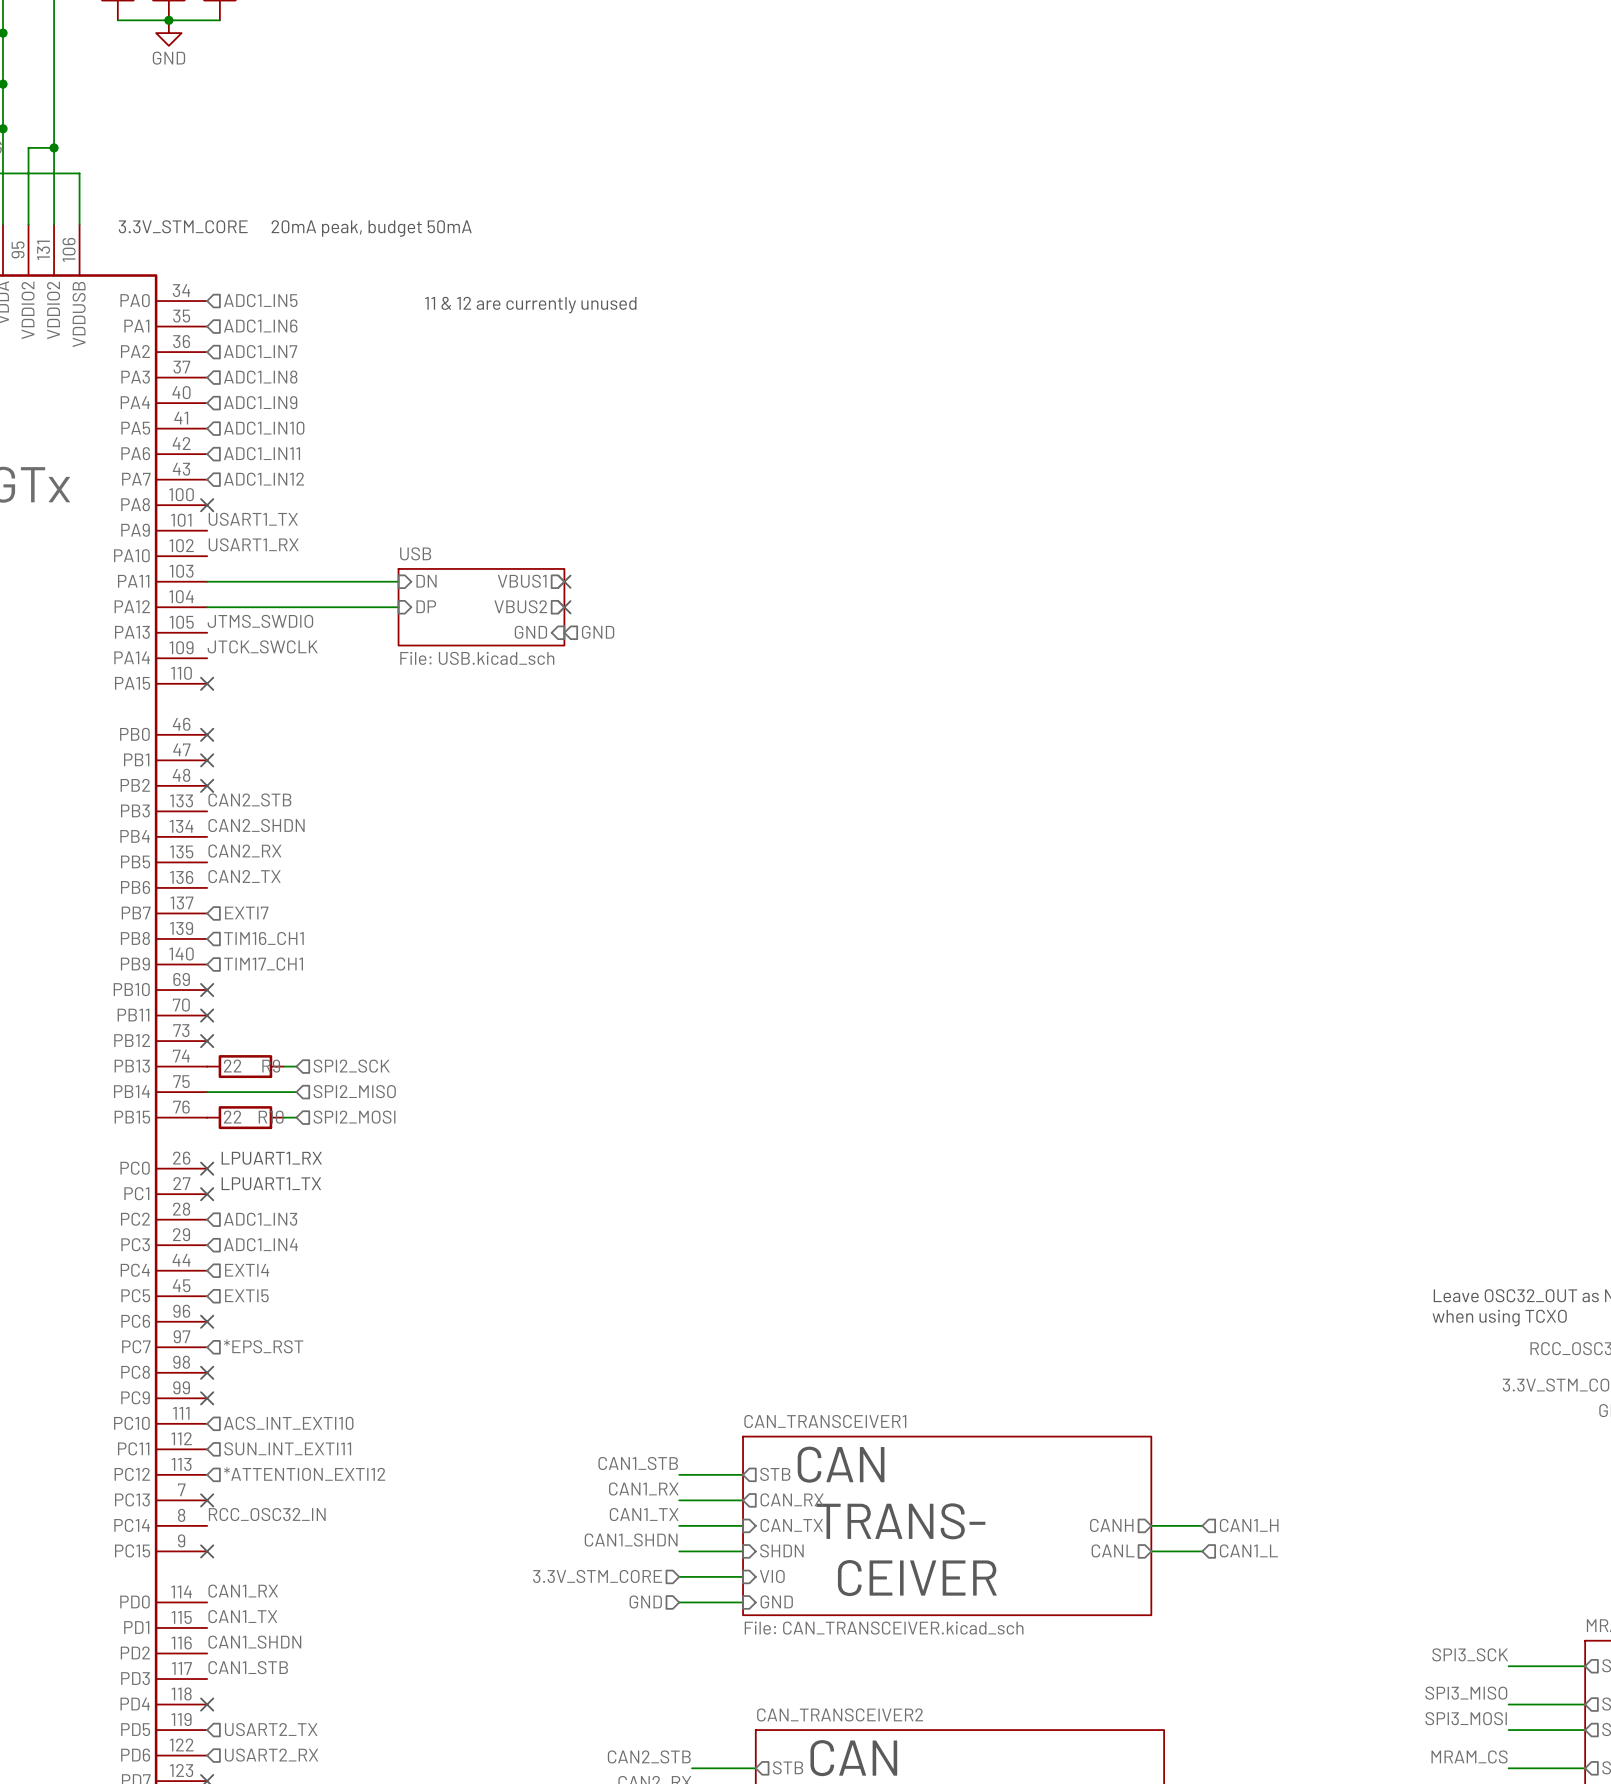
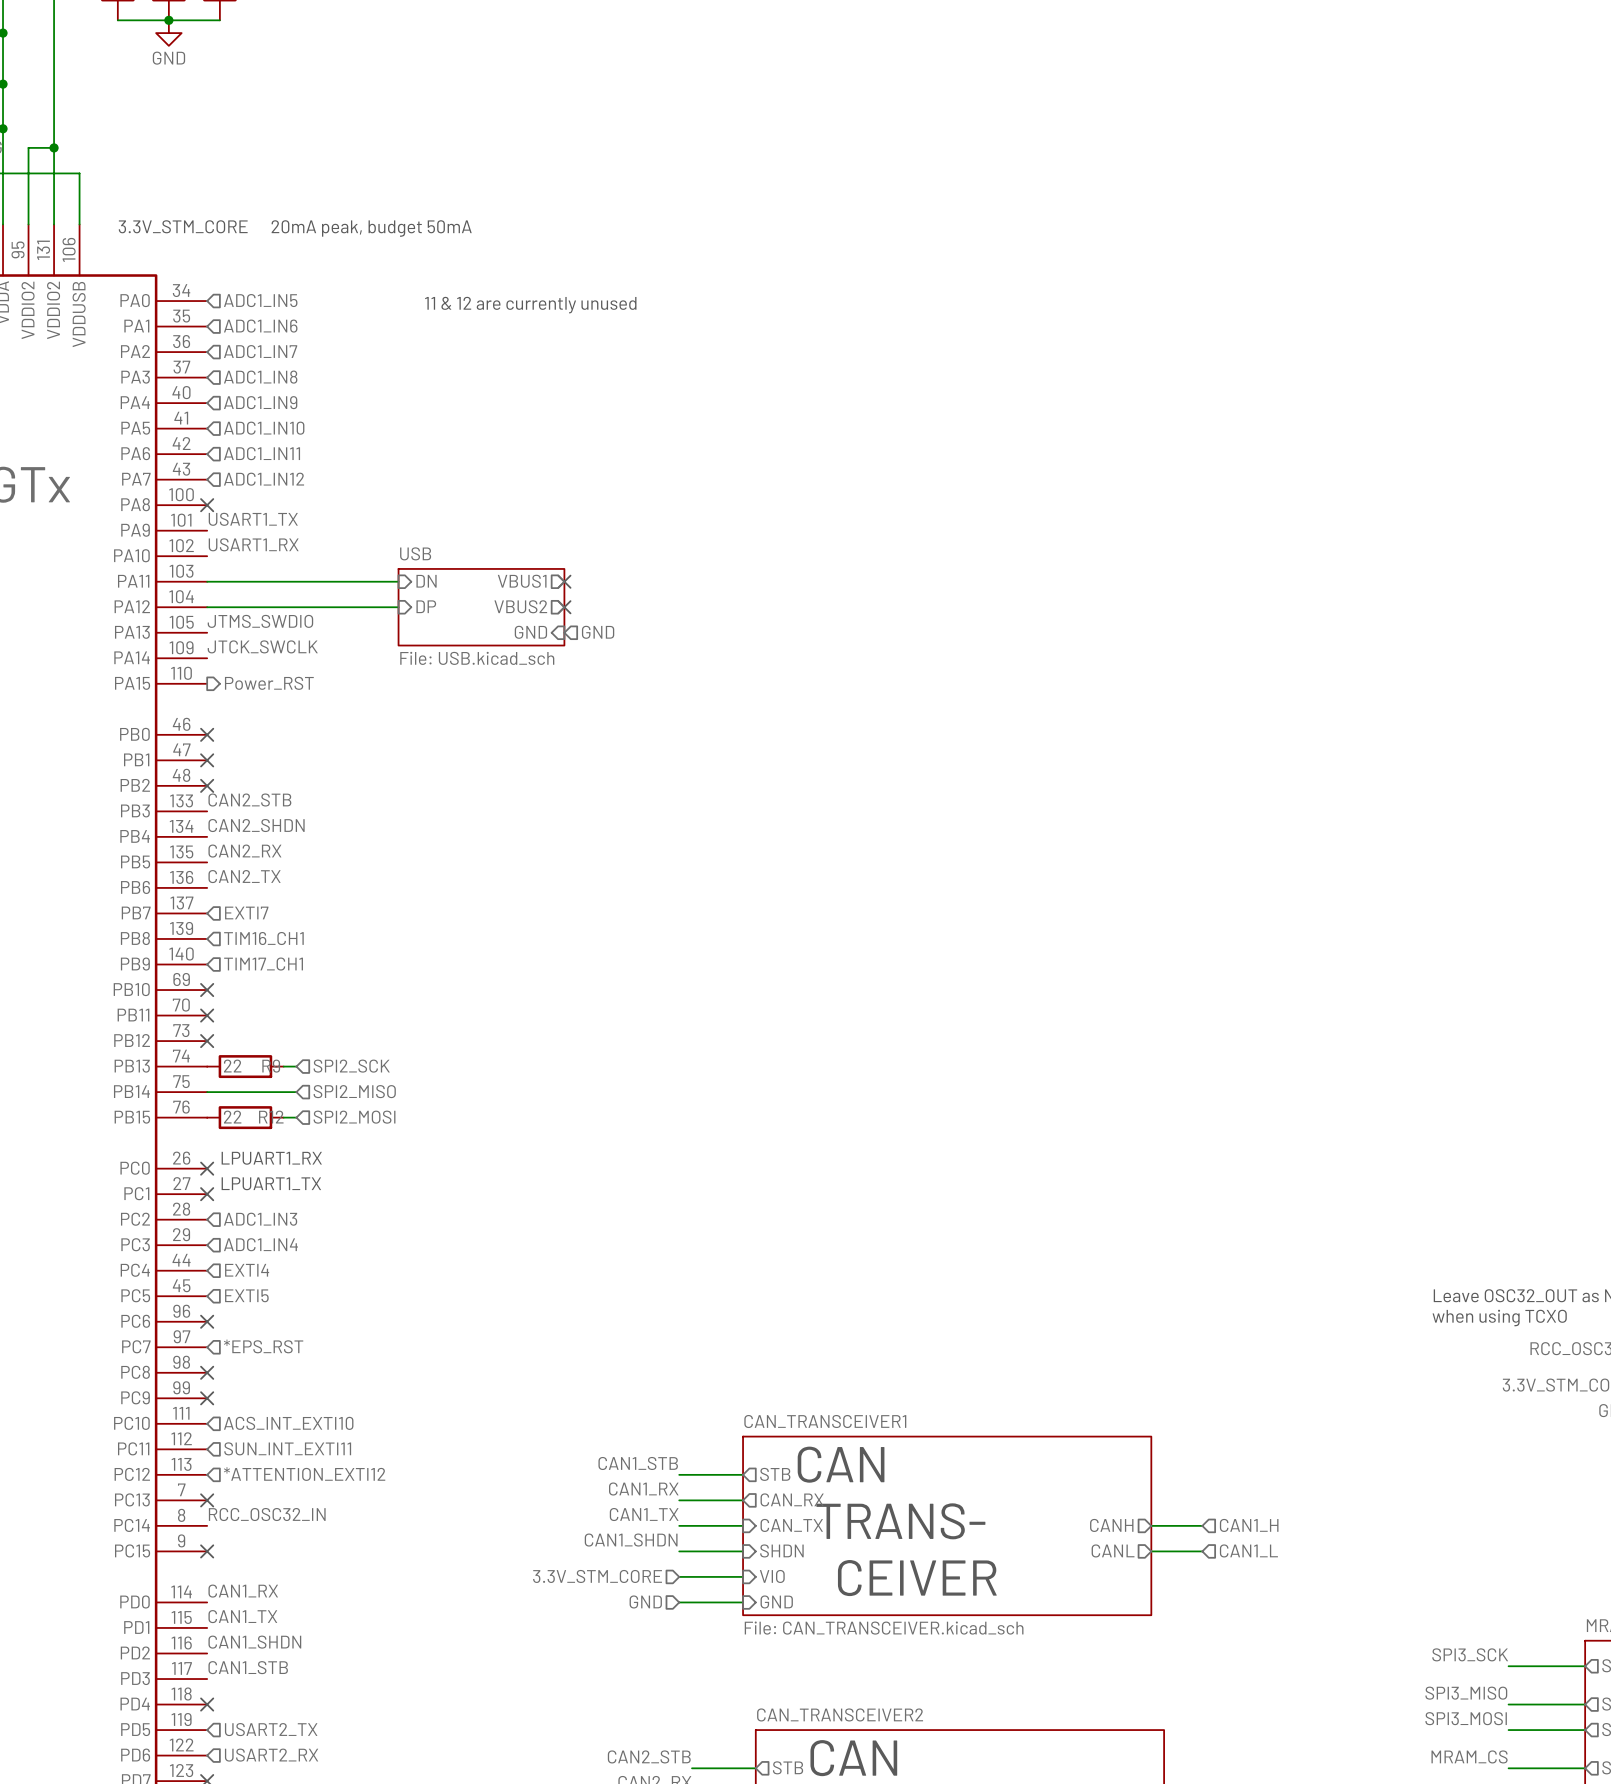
no-connect mark: (207, 683) -> none
hierarchical label: none -> Power_RST (269, 683)
R10 name: R10 (271, 1117) -> R12 (271, 1117)

